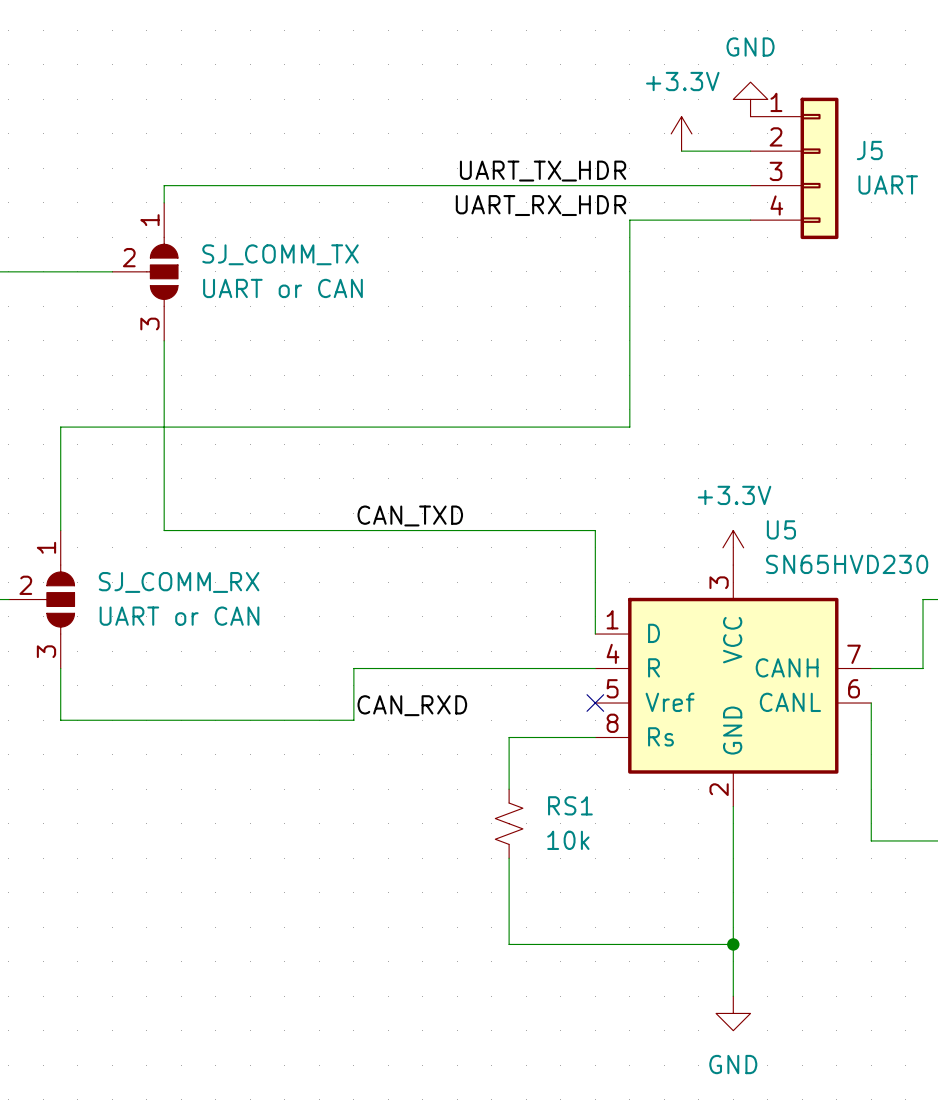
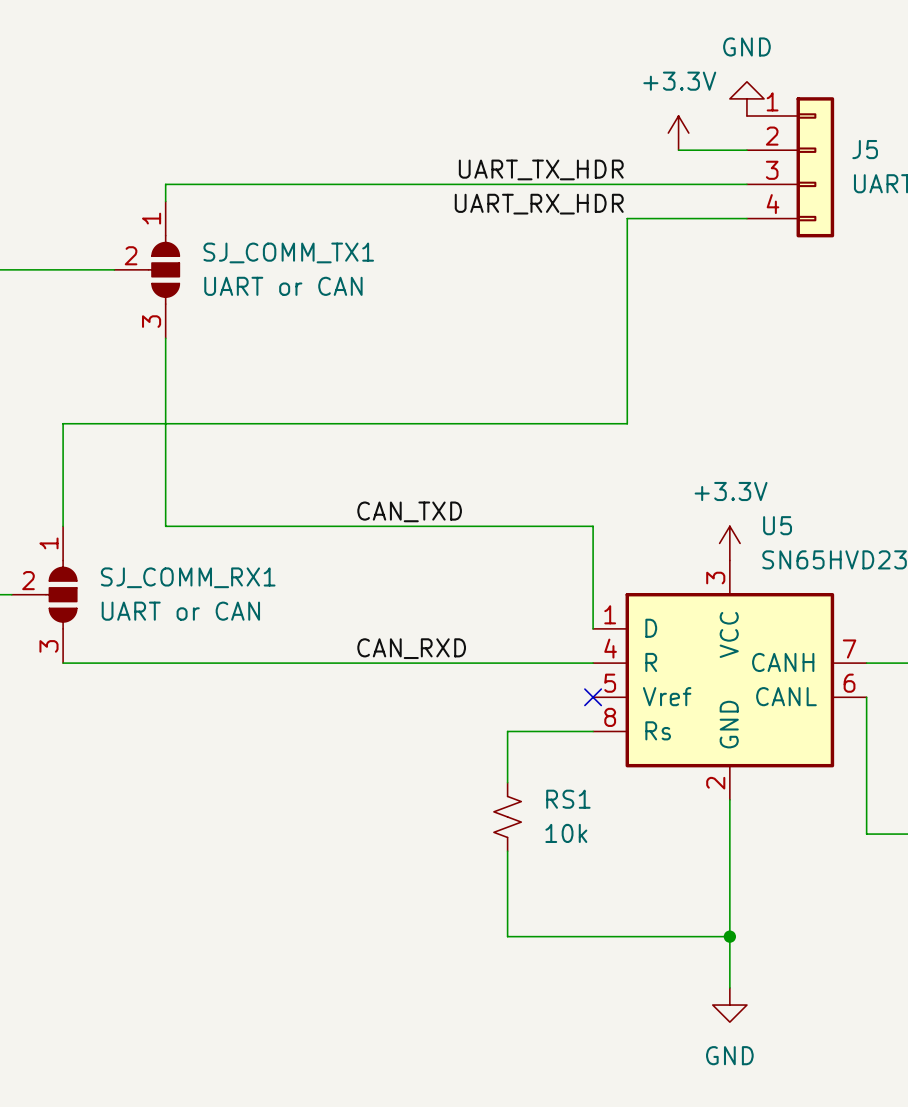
SJ_COMM_TX name: SJ_COMM_TX (280, 254) -> SJ_COMM_TX1 (288, 252)
SJ_COMM_RX name: SJ_COMM_RX (179, 582) -> SJ_COMM_RX1 (188, 577)
wire: (60, 668) (60, 720) (353, 720) (353, 668) -> (63, 663) (353, 663)
label position: CAN_RXD (412, 705) -> CAN_RXD (411, 648)

